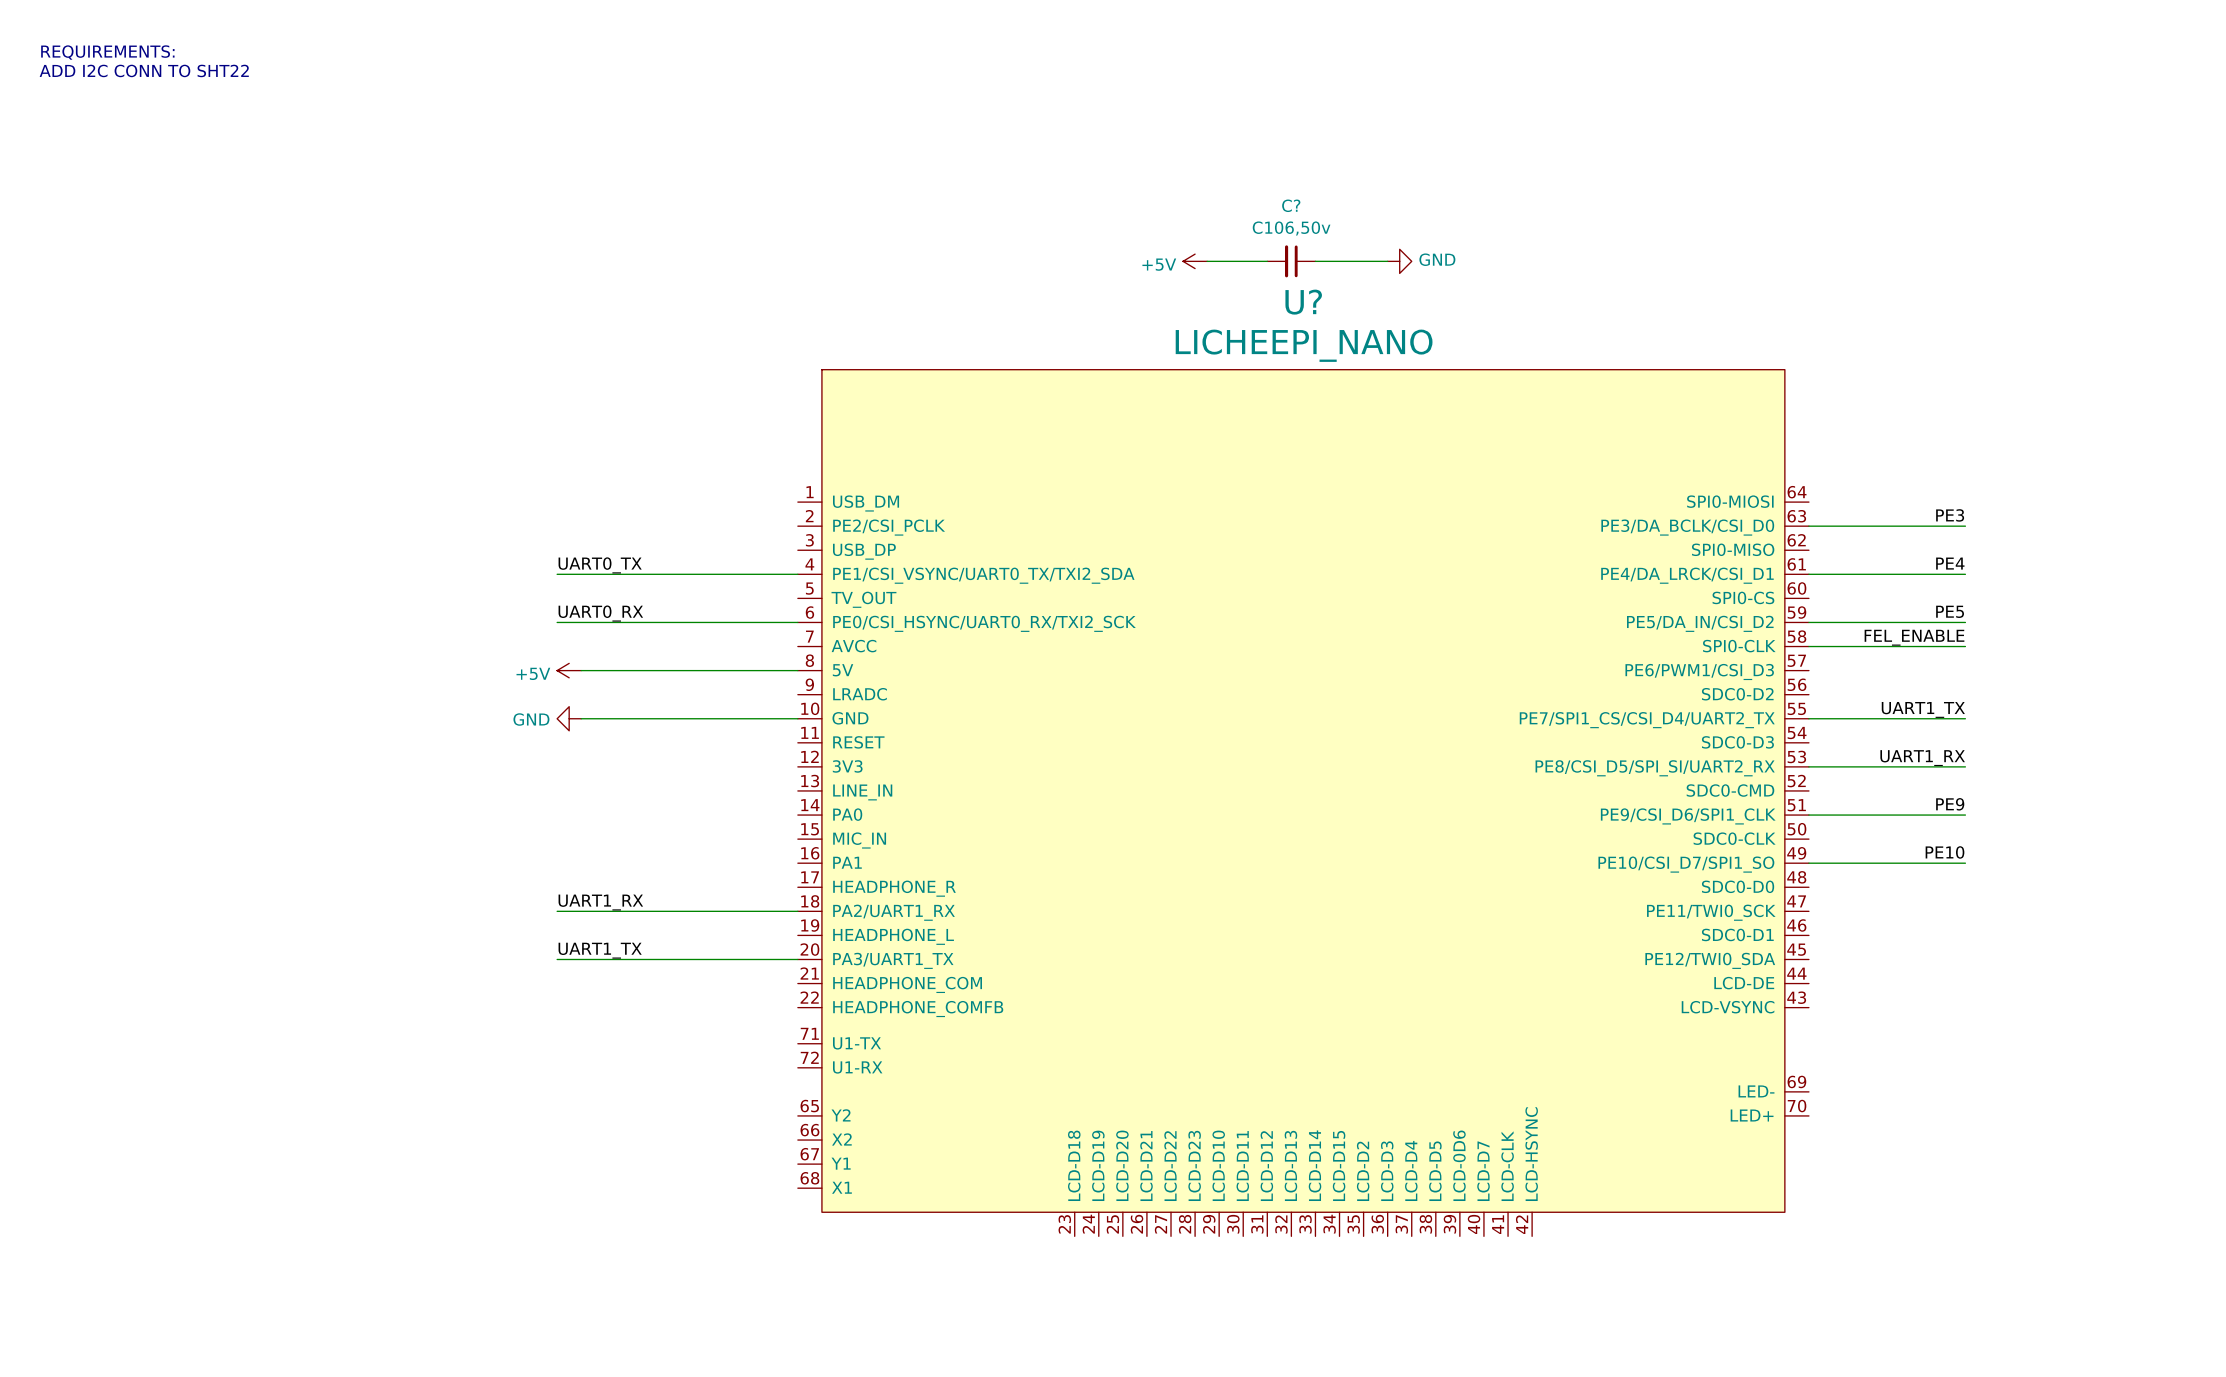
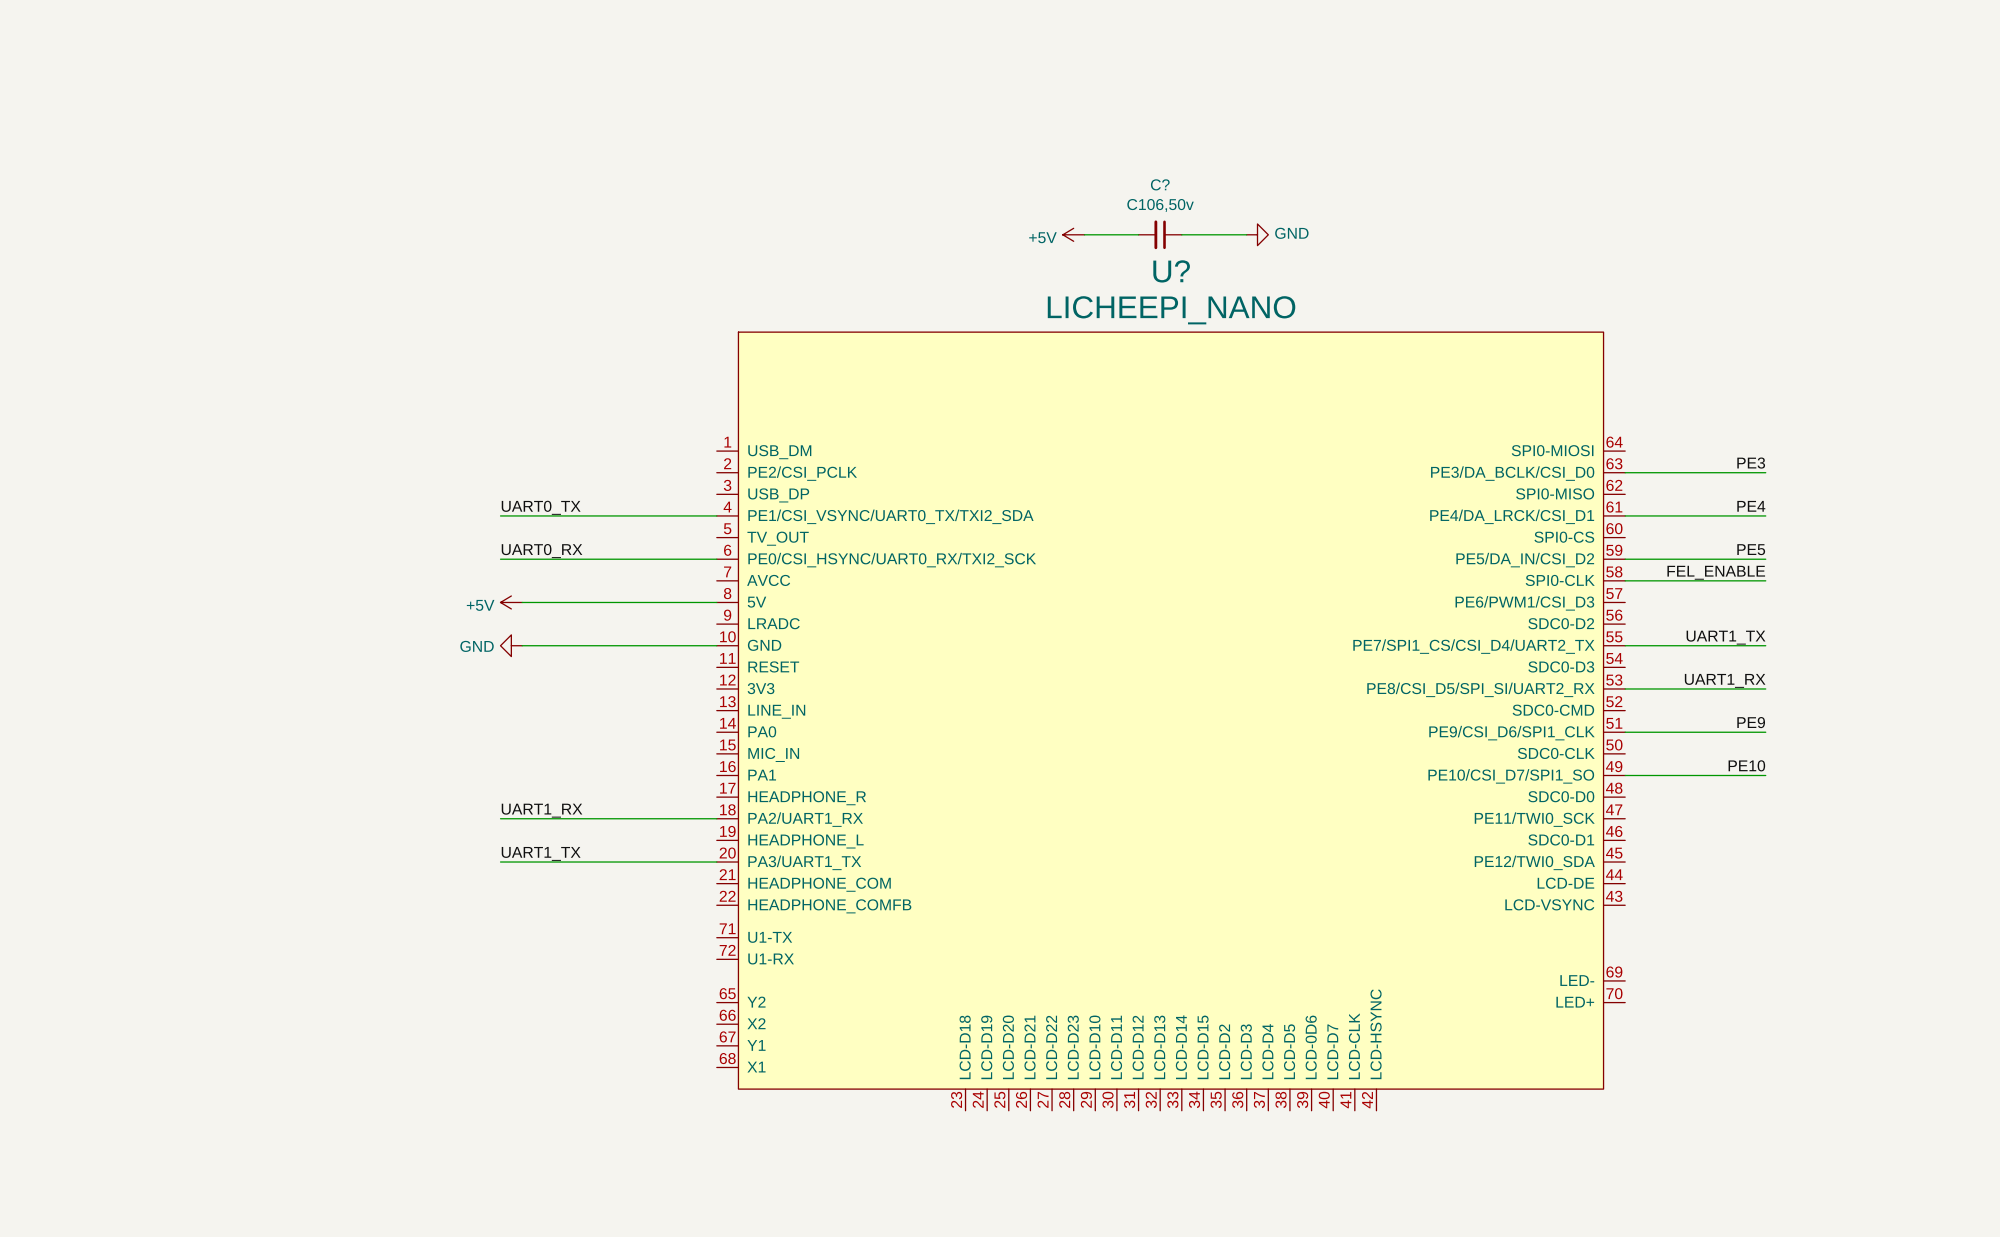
text: REQUIREMENTS: (107, 52) -> none
text: ADD I2C CONN TO SHT22 (144, 70) -> none

